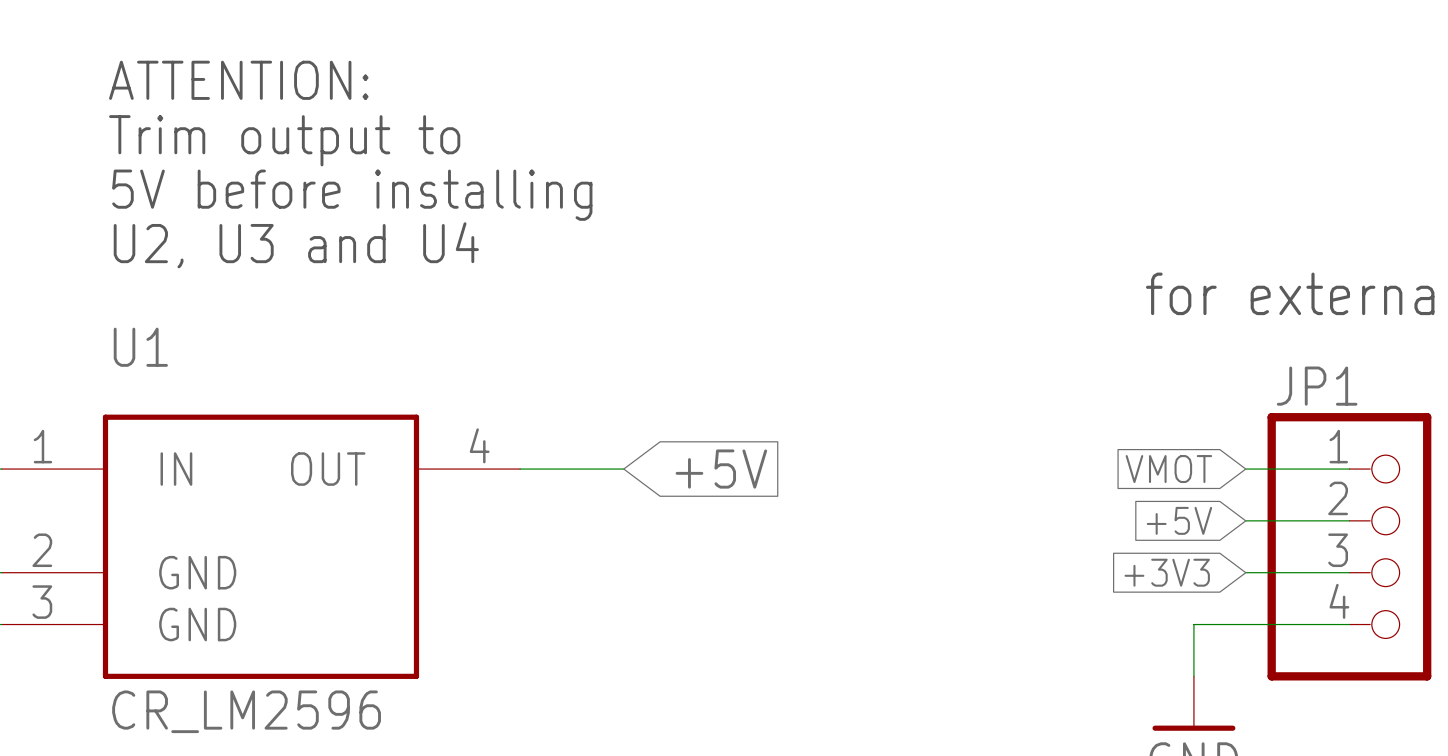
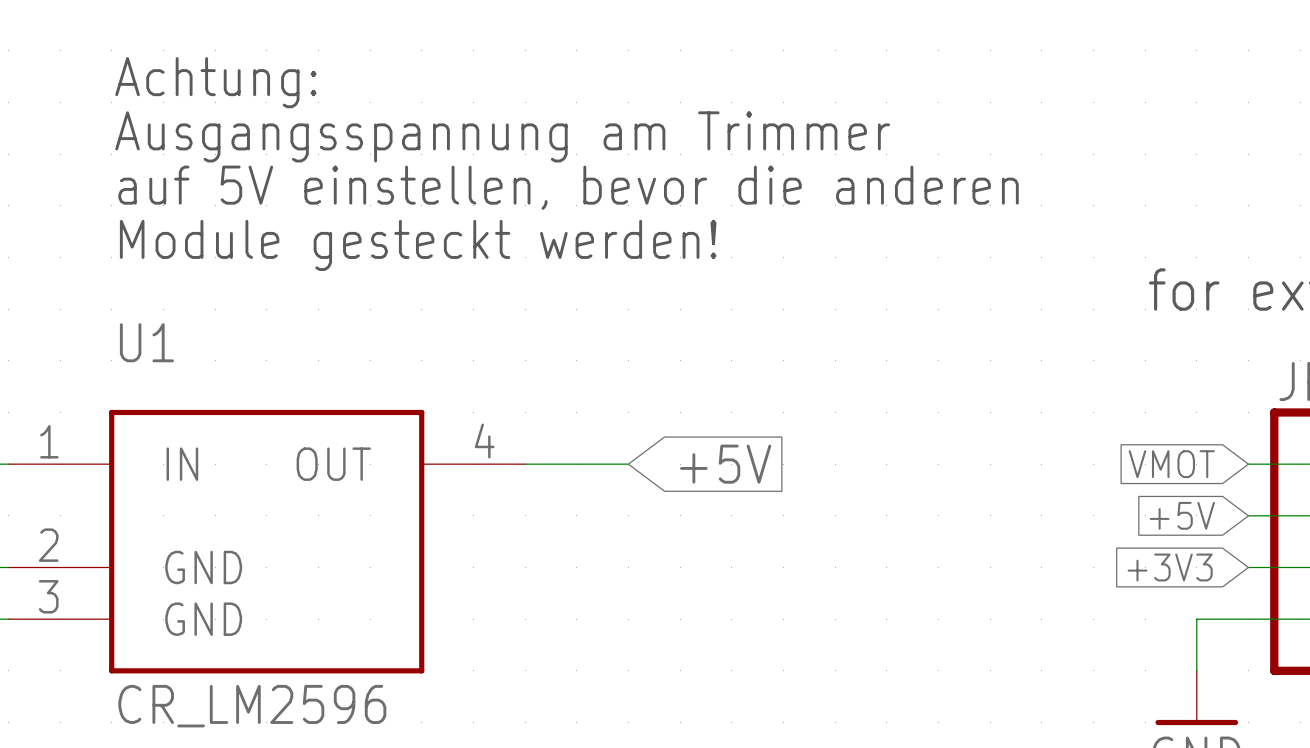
text: ATTENTION: (238, 80) -> Achtung: (215, 82)
text: Trim output to (284, 140) -> Ausgangsspannung am Trimmer (502, 136)
text: 5V before installing (352, 195) -> auf 5V einstellen, bevor die anderen (568, 187)
text: U2, U3 and U4 (296, 245) -> Module gesteckt werden! (418, 245)

